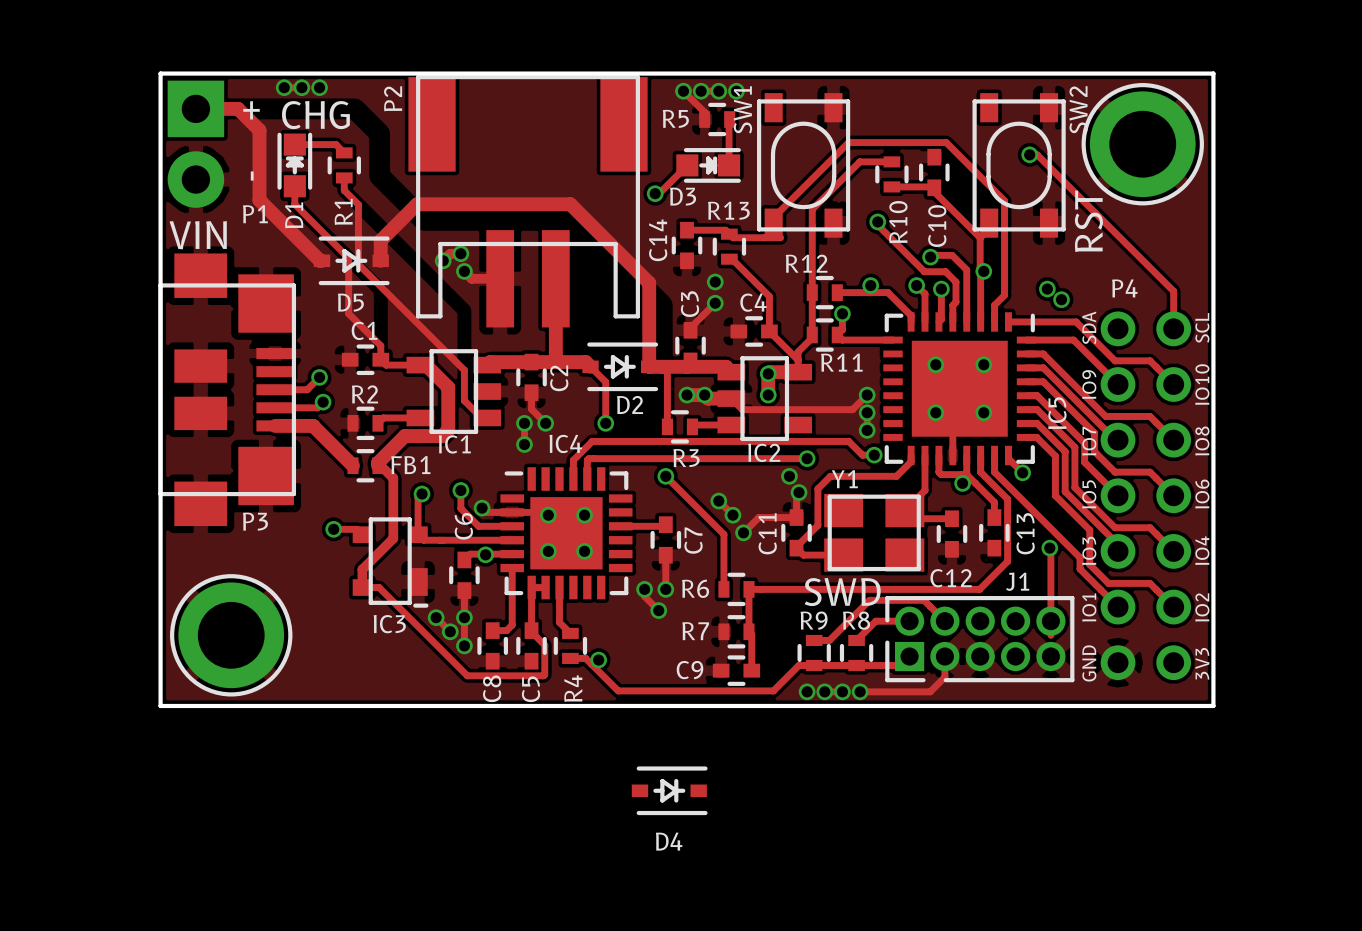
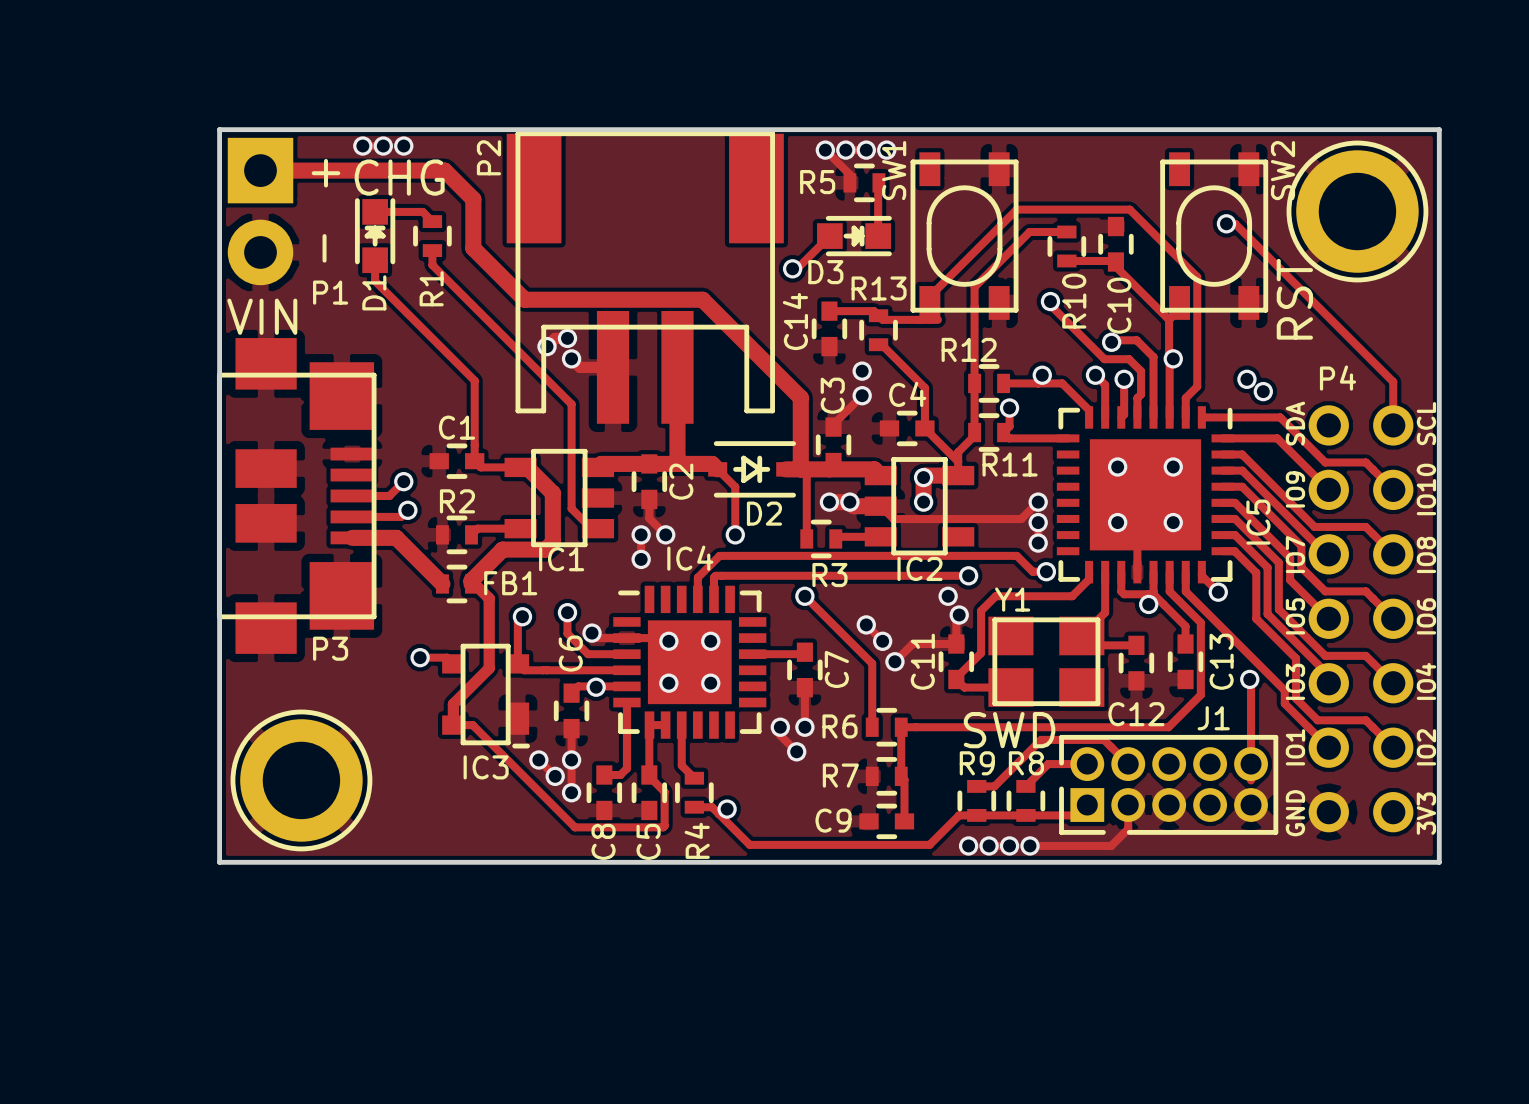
track: (238, 108) (259, 130) (259, 200) (322, 260) -> (309, 170) (444, 170) (473, 199) (473, 248) (524, 299) (702, 299) (800, 397) (800, 469)
track: (358, 204) (358, 264) (464, 370) -> (448, 281) (571, 404) (571, 473)
track: (348, 258) (348, 313) (380, 345) -> (437, 343) (474, 380) (474, 445)
D5: (351, 260) -> none
track: (380, 260) (380, 240) (417, 204) (570, 204) (649, 283) (649, 366) -> none
D4: (669, 790) -> none

